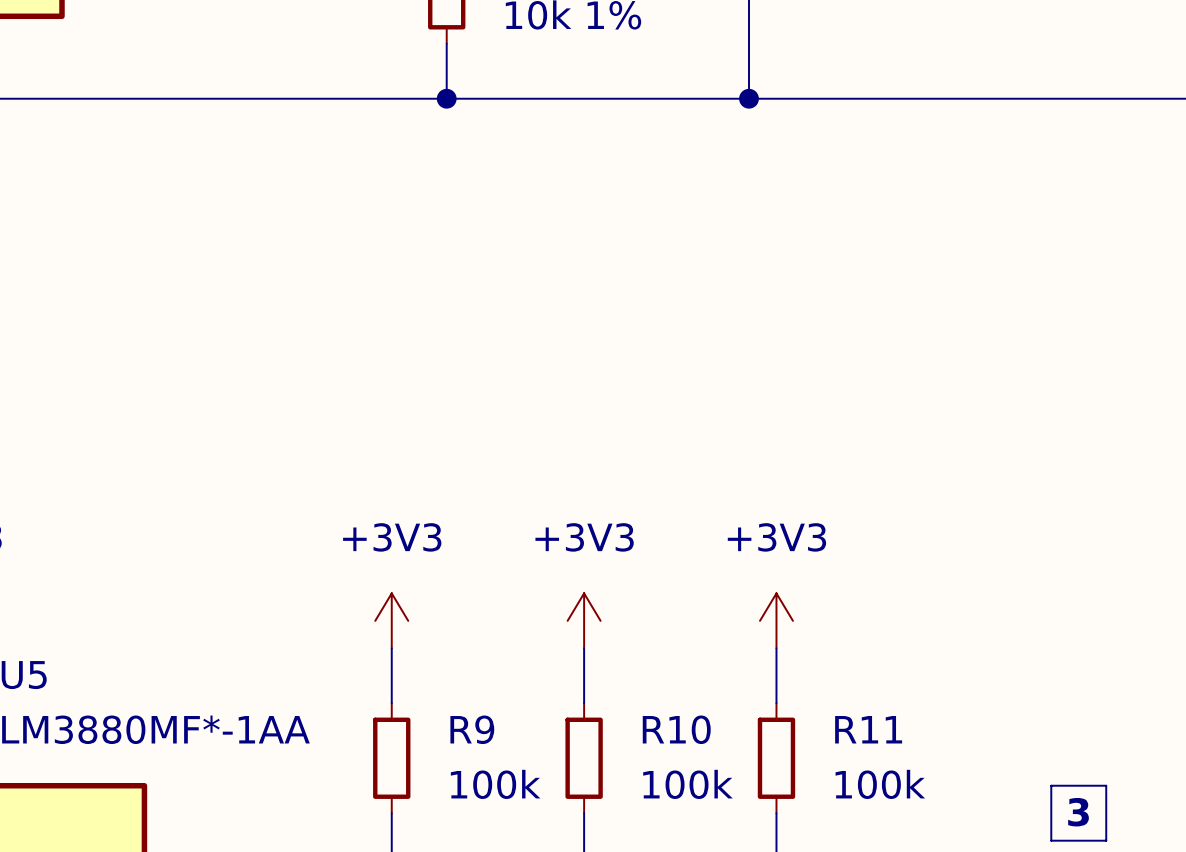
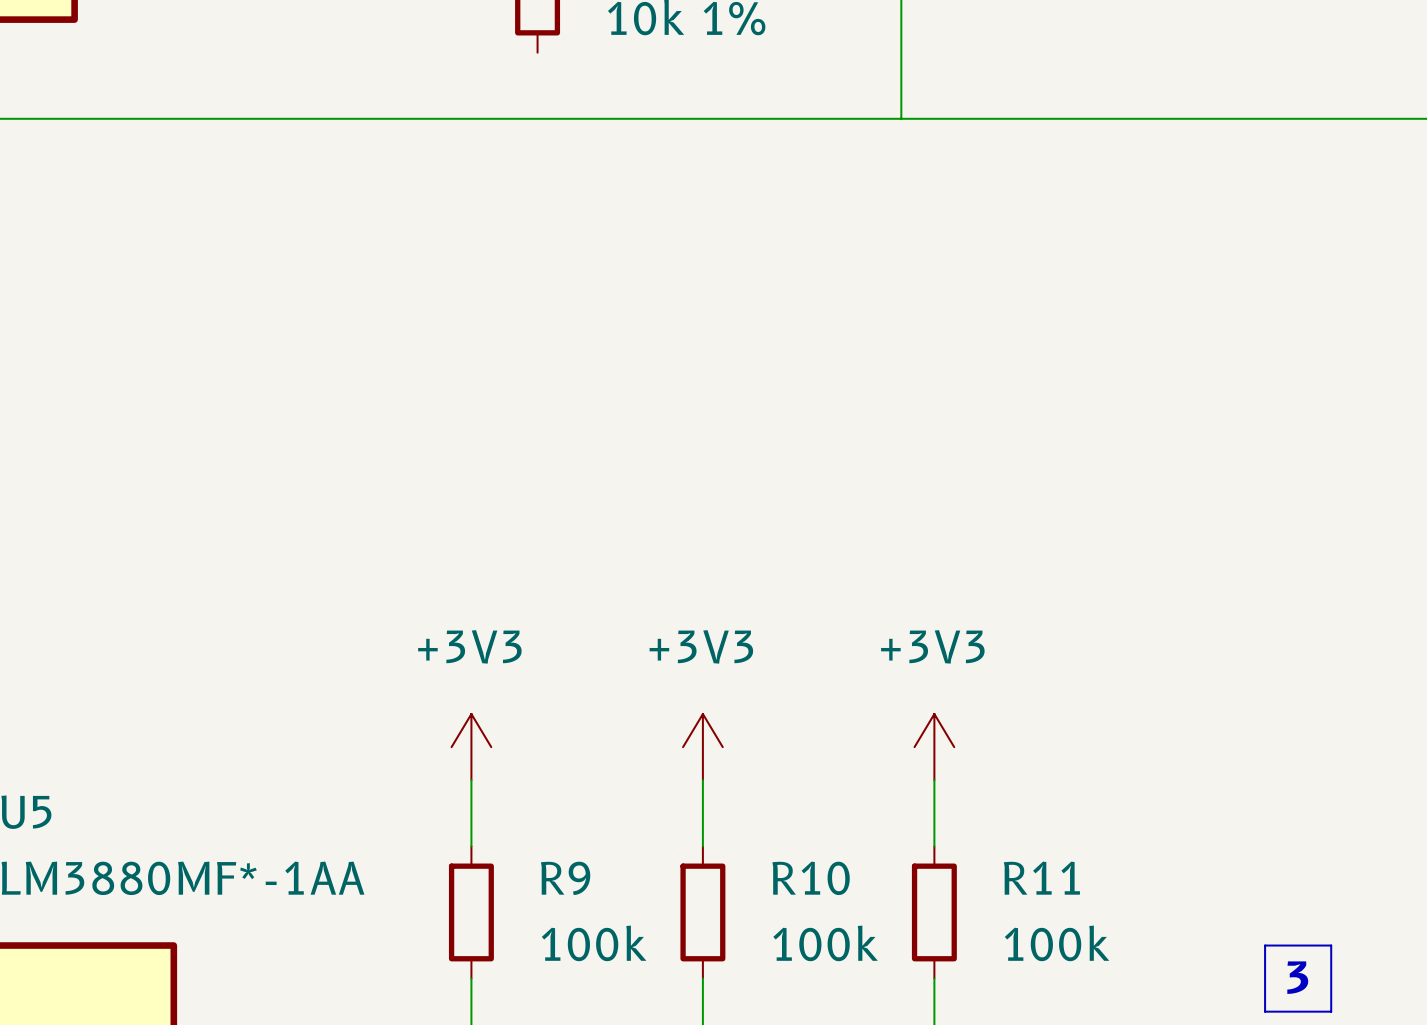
wire: (446, 43) (446, 98) -> none
junction: (446, 98) -> none
junction: (749, 98) -> none

